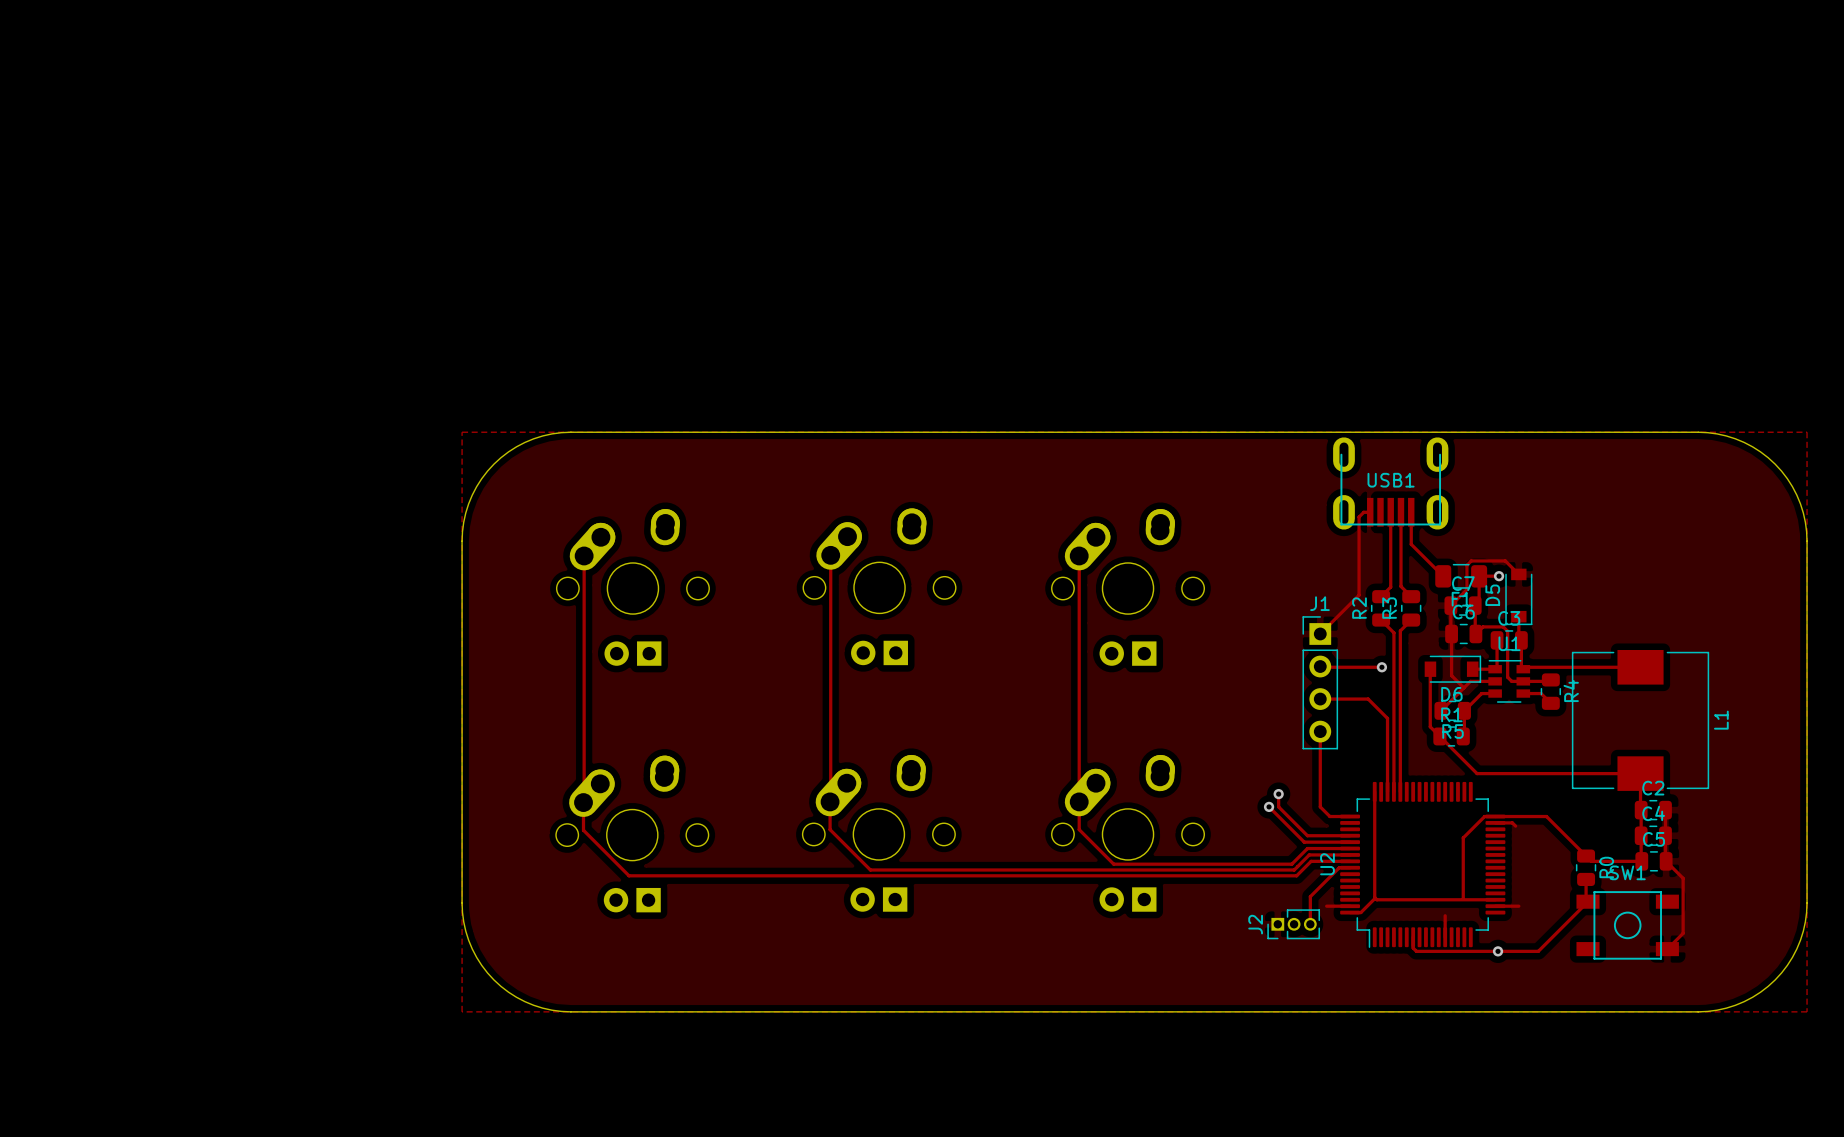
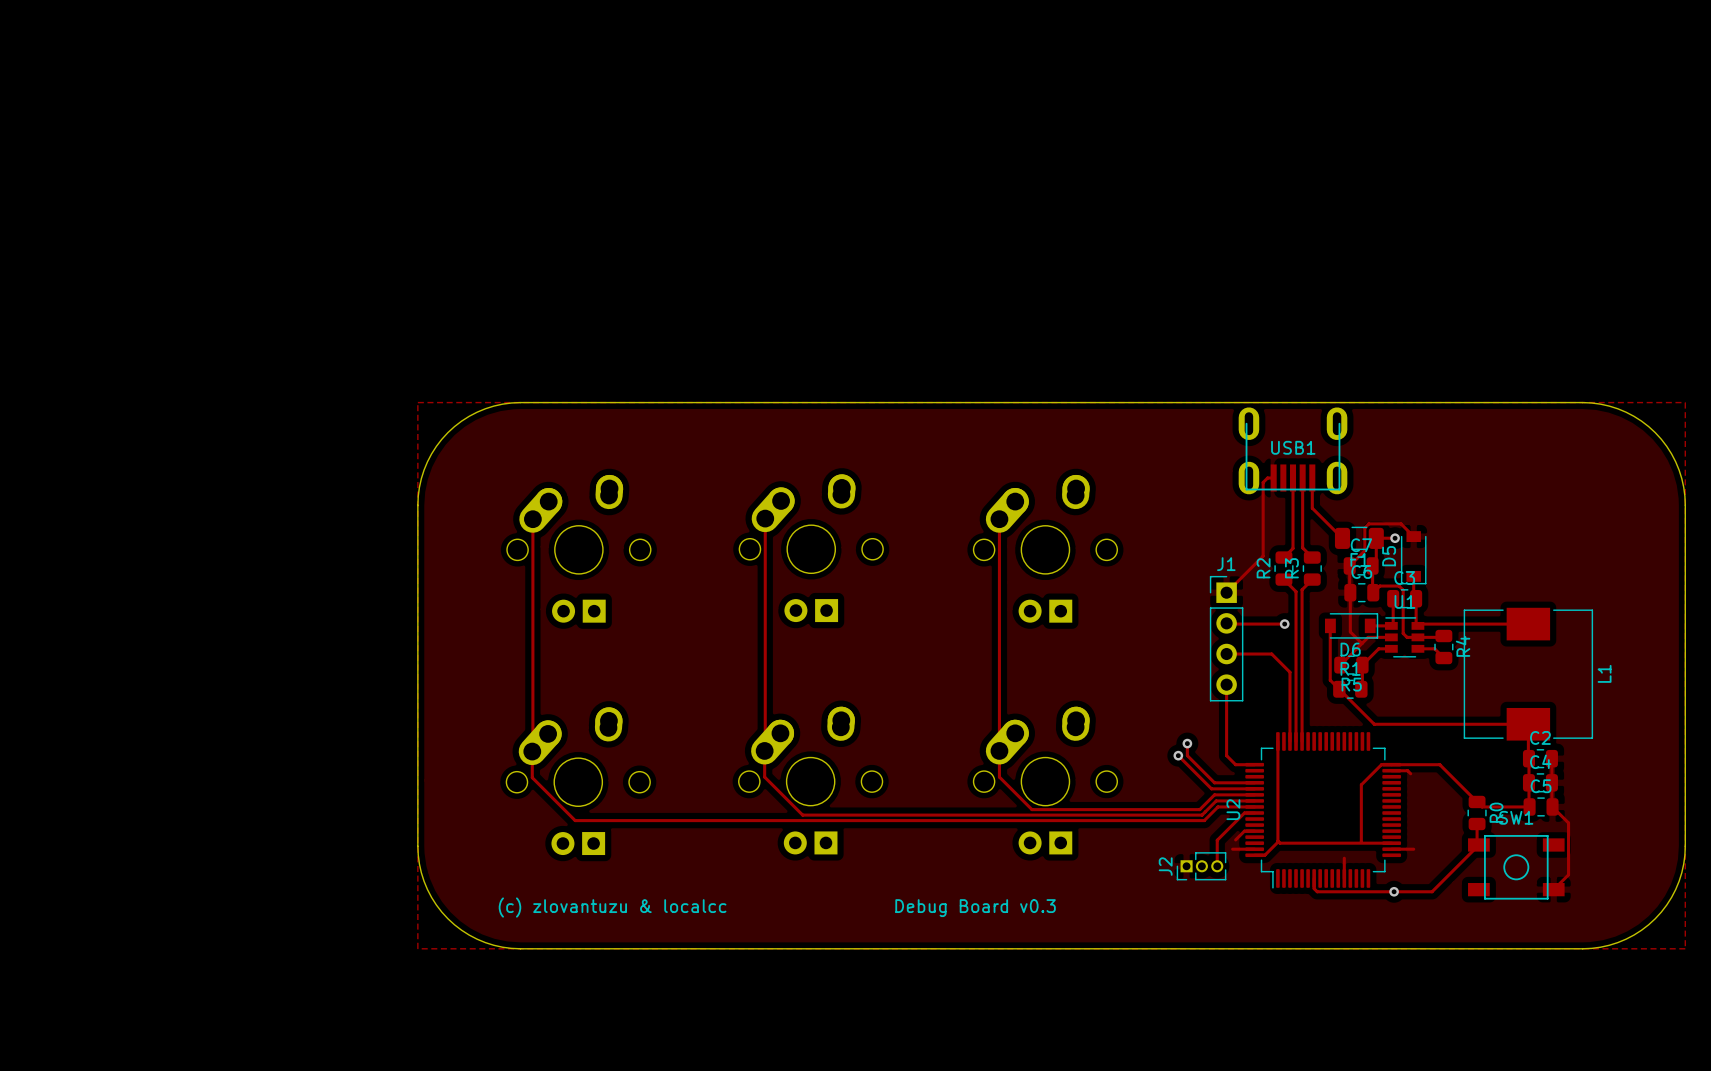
track: none -> (1254, 831) (1244, 831) (1235, 839)
text: none -> (c) zlovantuzu & localcc Debug Board v0.3 (777, 907)

